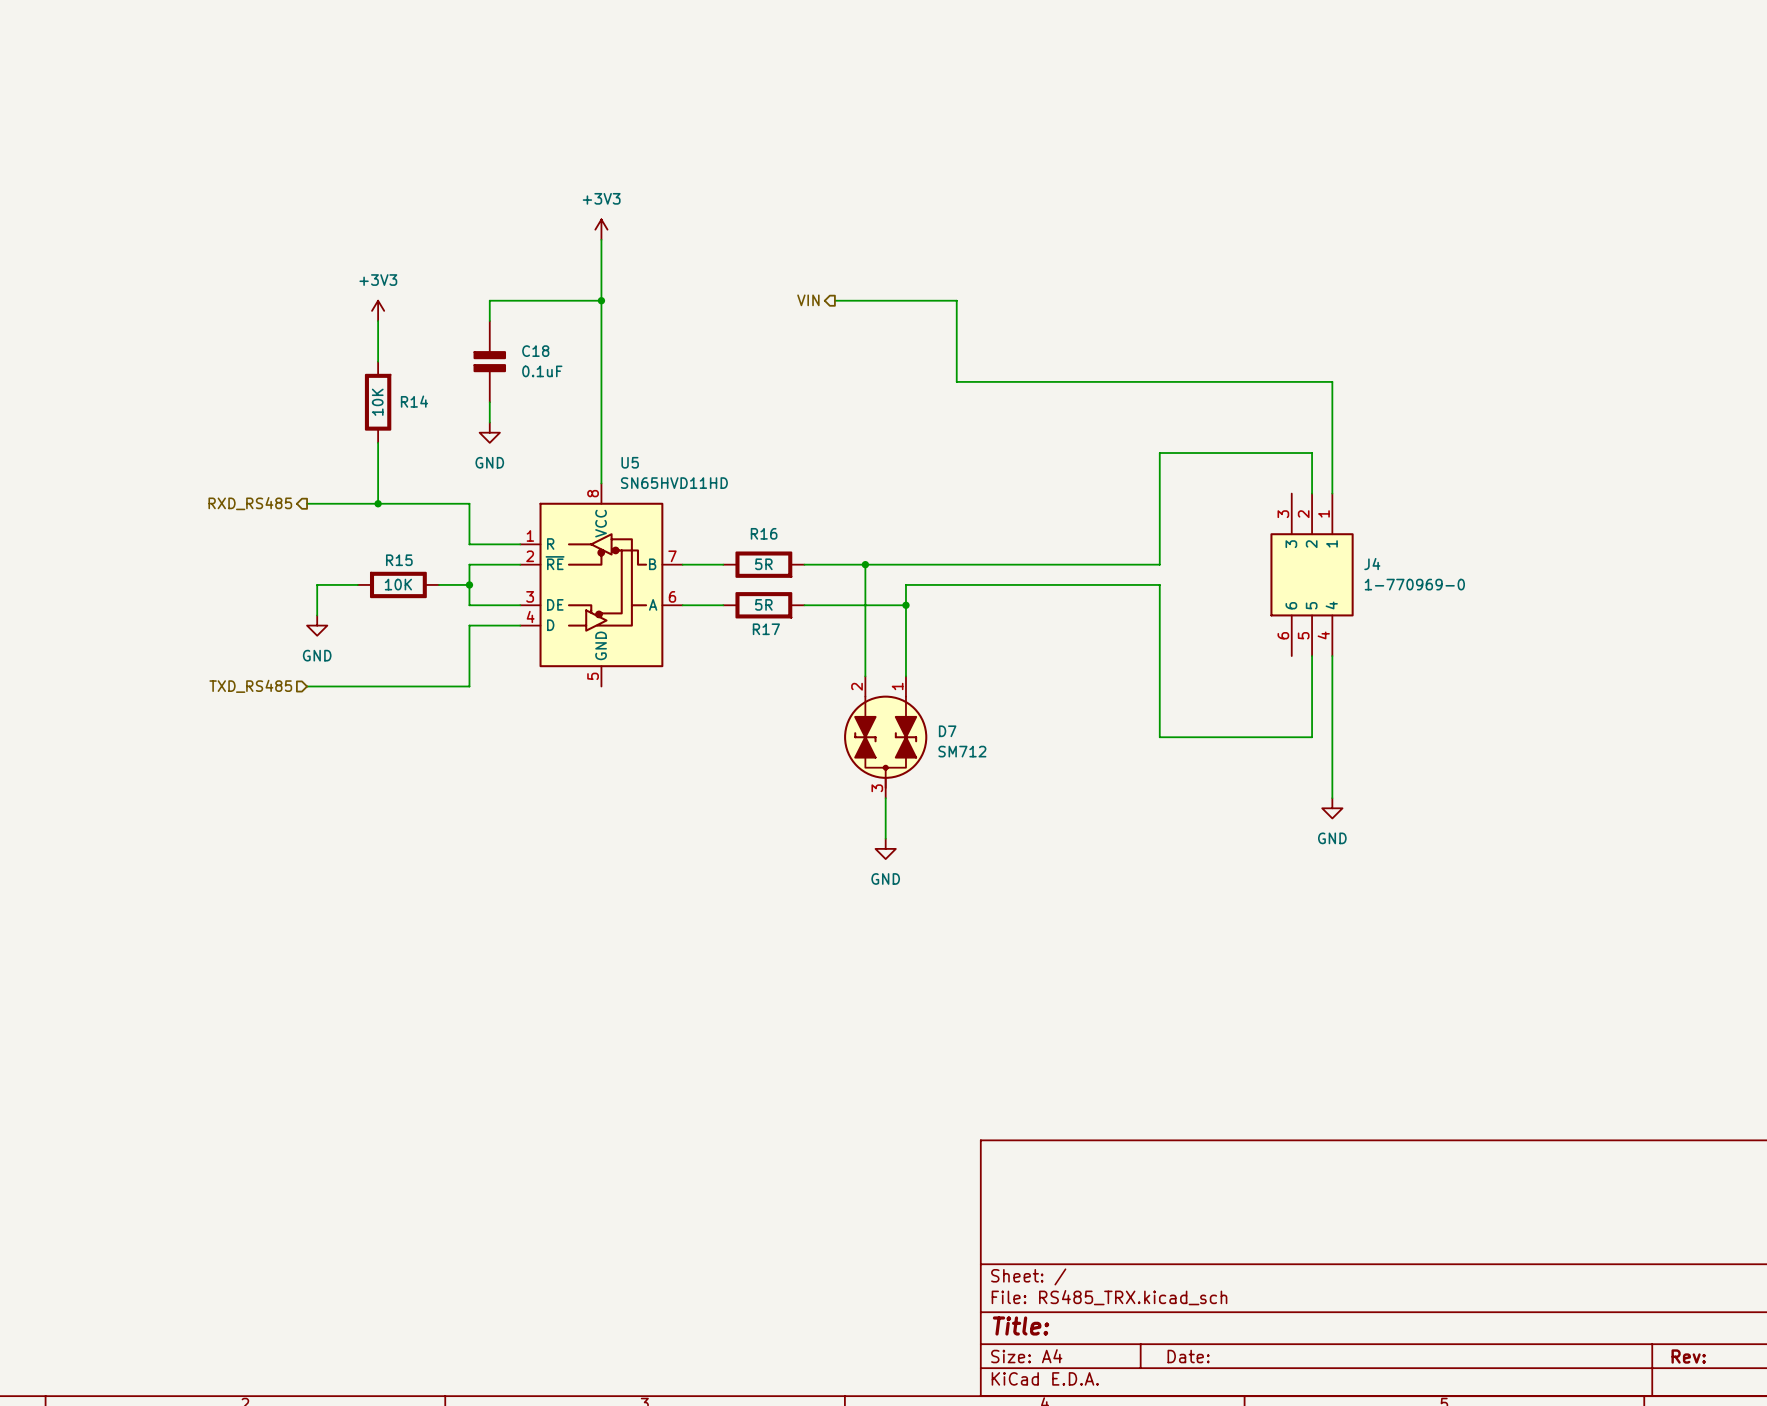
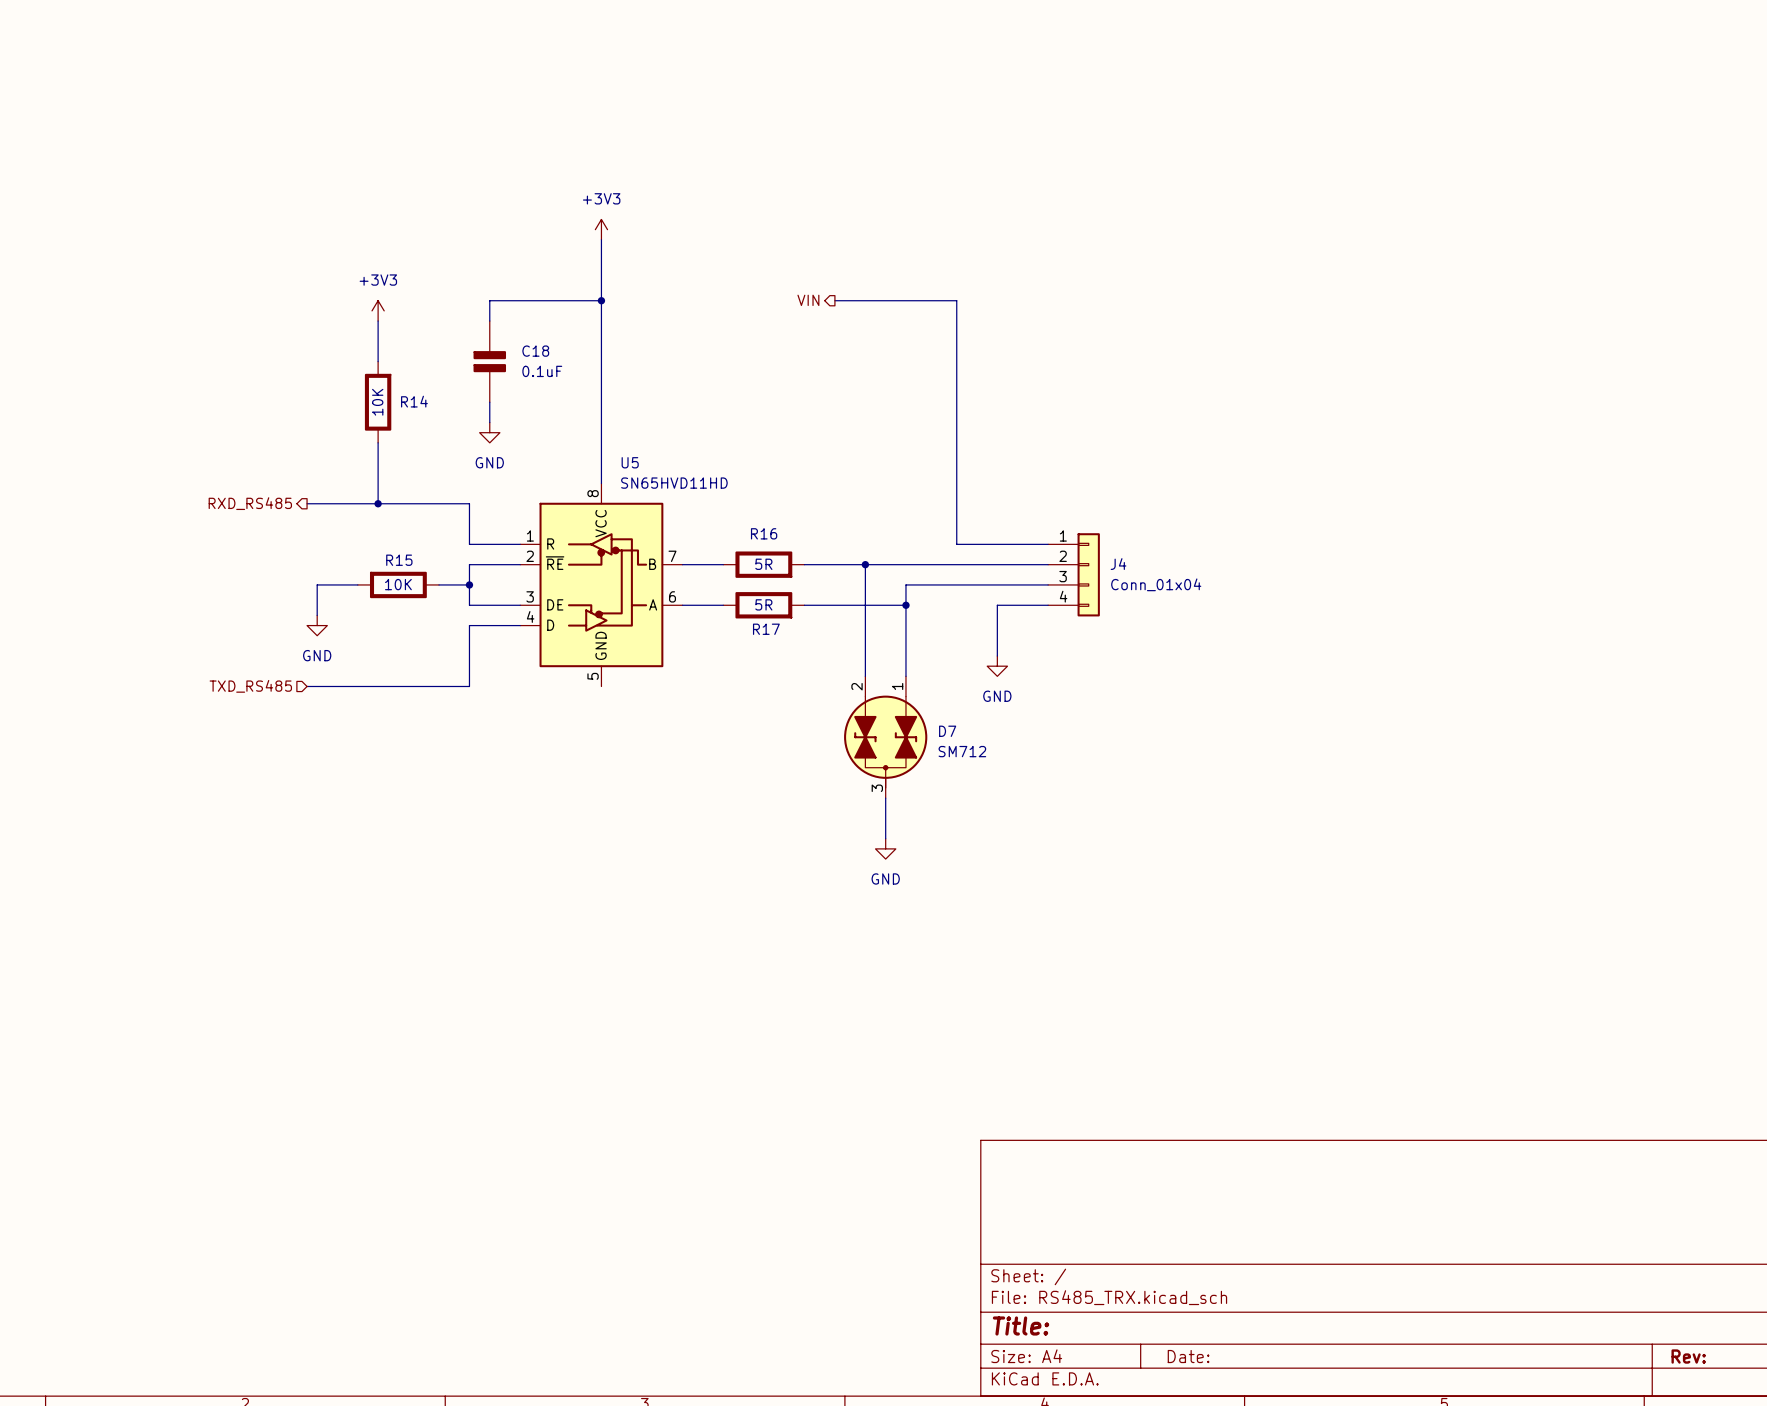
wire: (956, 381) (1332, 381) (1332, 493) -> (956, 381) (956, 544) (1048, 544)
J4 symbol: [1270, 493, 1354, 657] -> [1048, 533, 1100, 617]
wire: (1312, 493) (1312, 453) (1159, 453) (1159, 564) (1048, 564) -> none
wire: (1048, 584) (1159, 584) (1159, 737) (1312, 737) (1312, 656) -> none
J4 value: 1-770969-0 (1414, 584) -> Conn_01x04 (1156, 584)
wire: none -> (1048, 605) (997, 605) (997, 656)
wire: (1332, 656) (1332, 798) -> none
power symbol: none -> GND (997, 666)
power symbol: GND (1332, 808) -> none

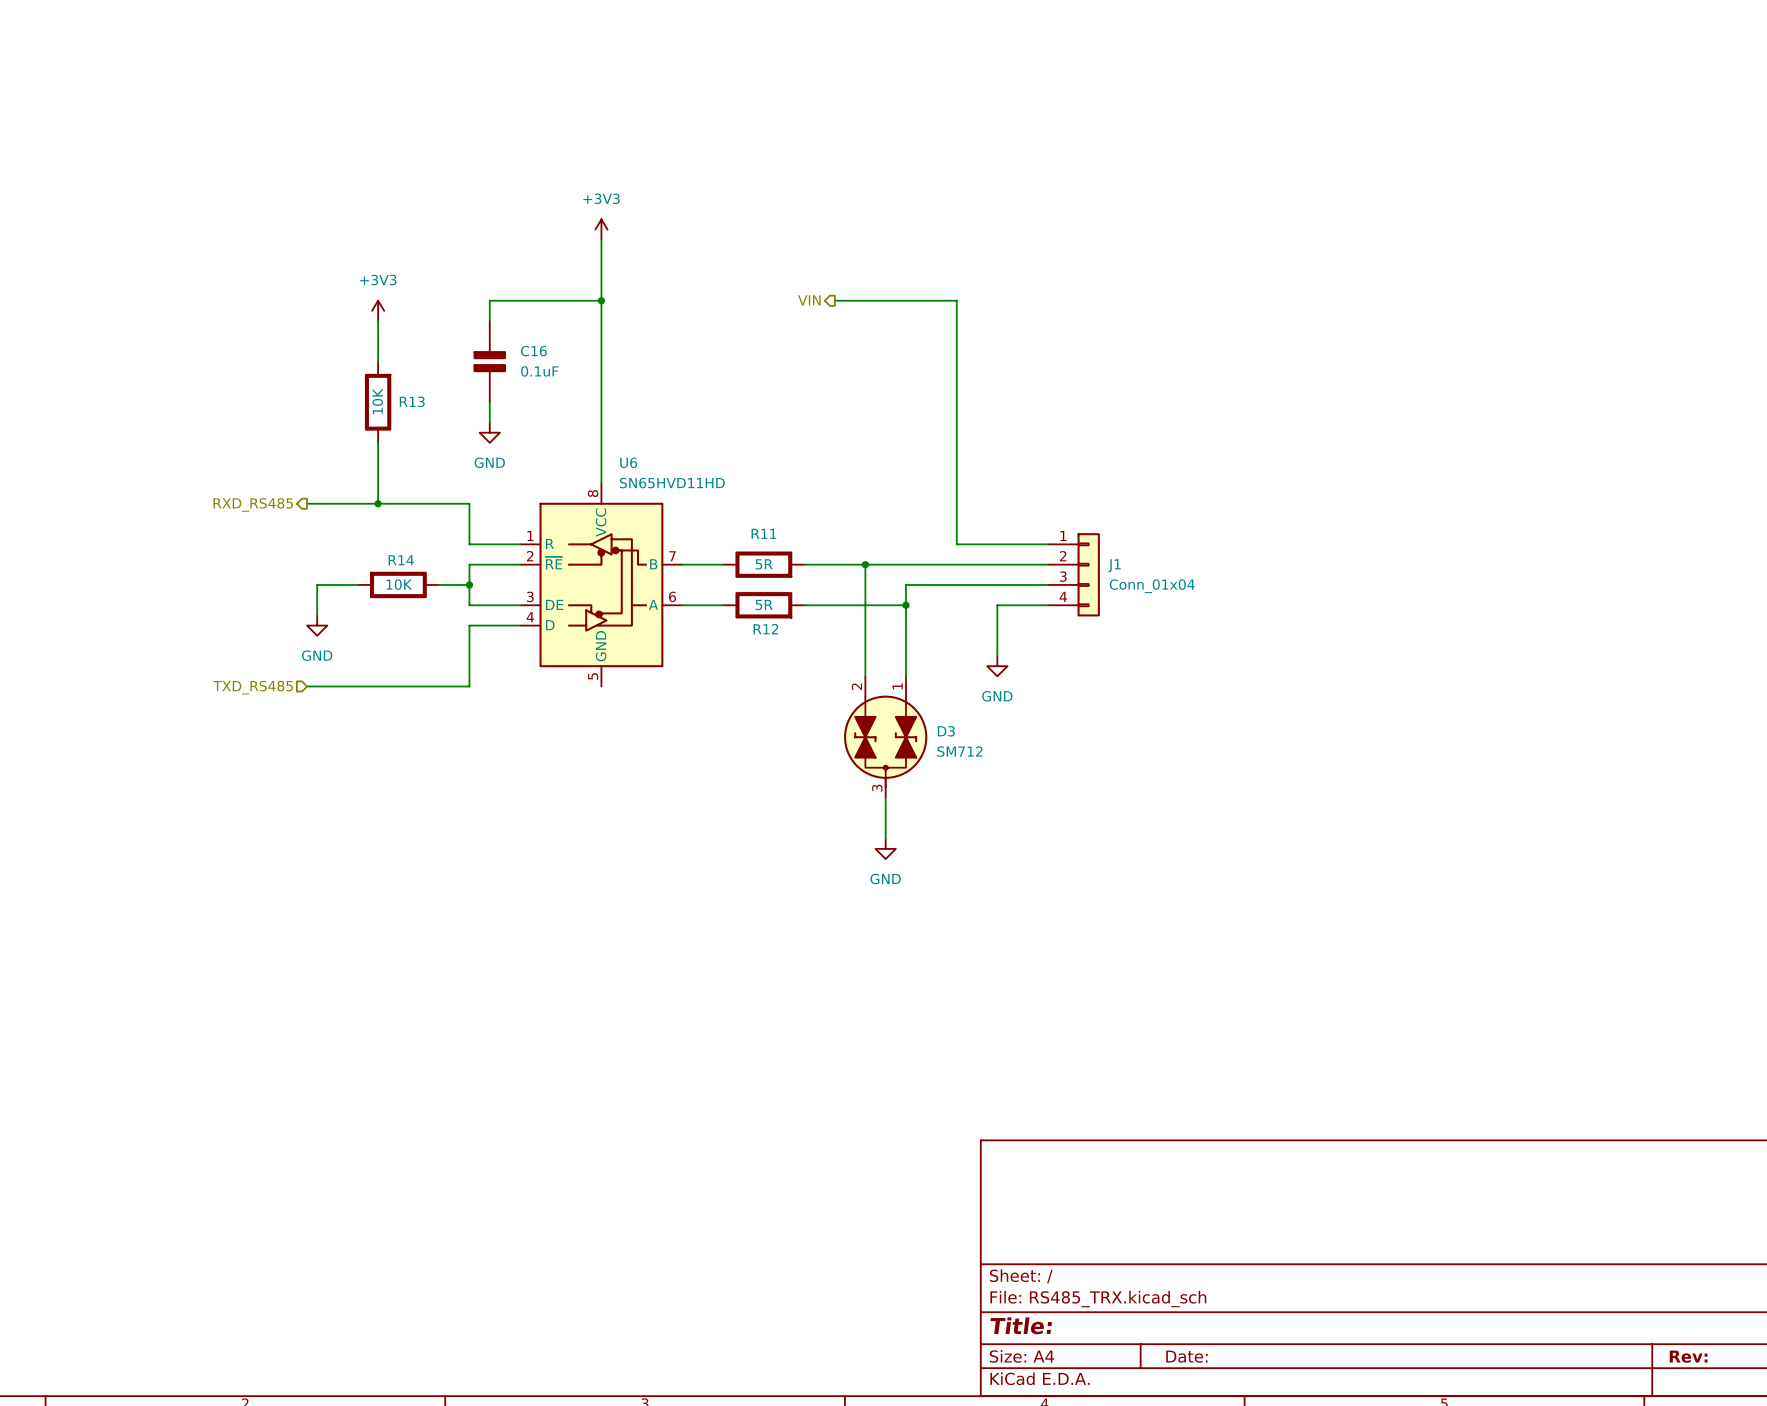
C18 name: C18 (535, 351) -> C16 (533, 351)
R14 name: R14 (414, 401) -> R13 (412, 401)
U5 name: U5 (630, 462) -> U6 (628, 462)
R16 name: R16 (764, 533) -> R11 (763, 533)
R15 name: R15 (399, 560) -> R14 (401, 560)
J4 name: J4 (1118, 564) -> J1 (1114, 565)
R17 name: R17 (766, 629) -> R12 (765, 629)
D7 name: D7 (947, 731) -> D3 (946, 731)

